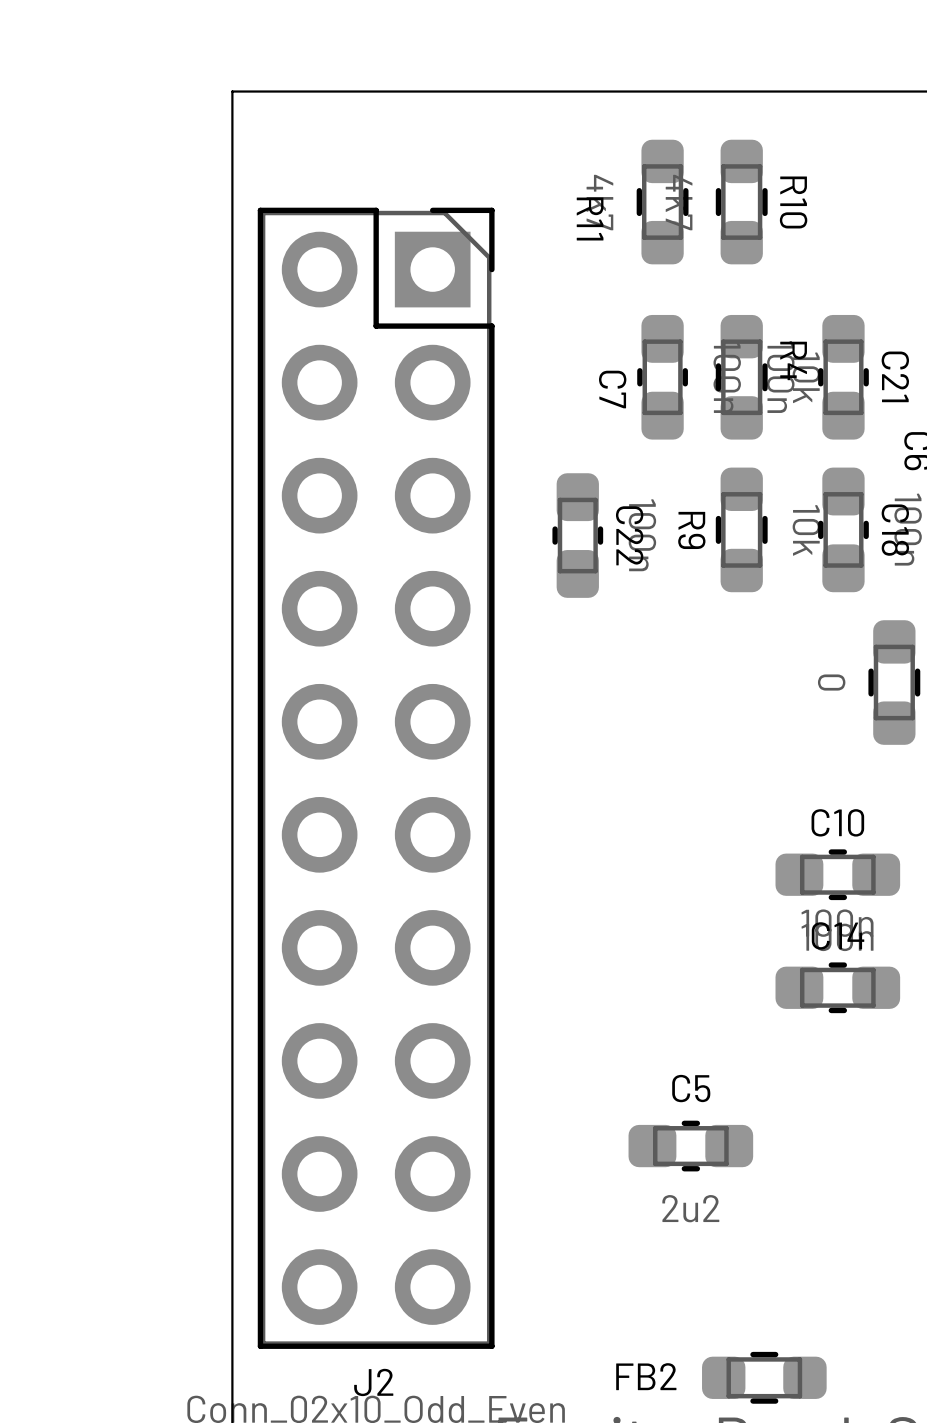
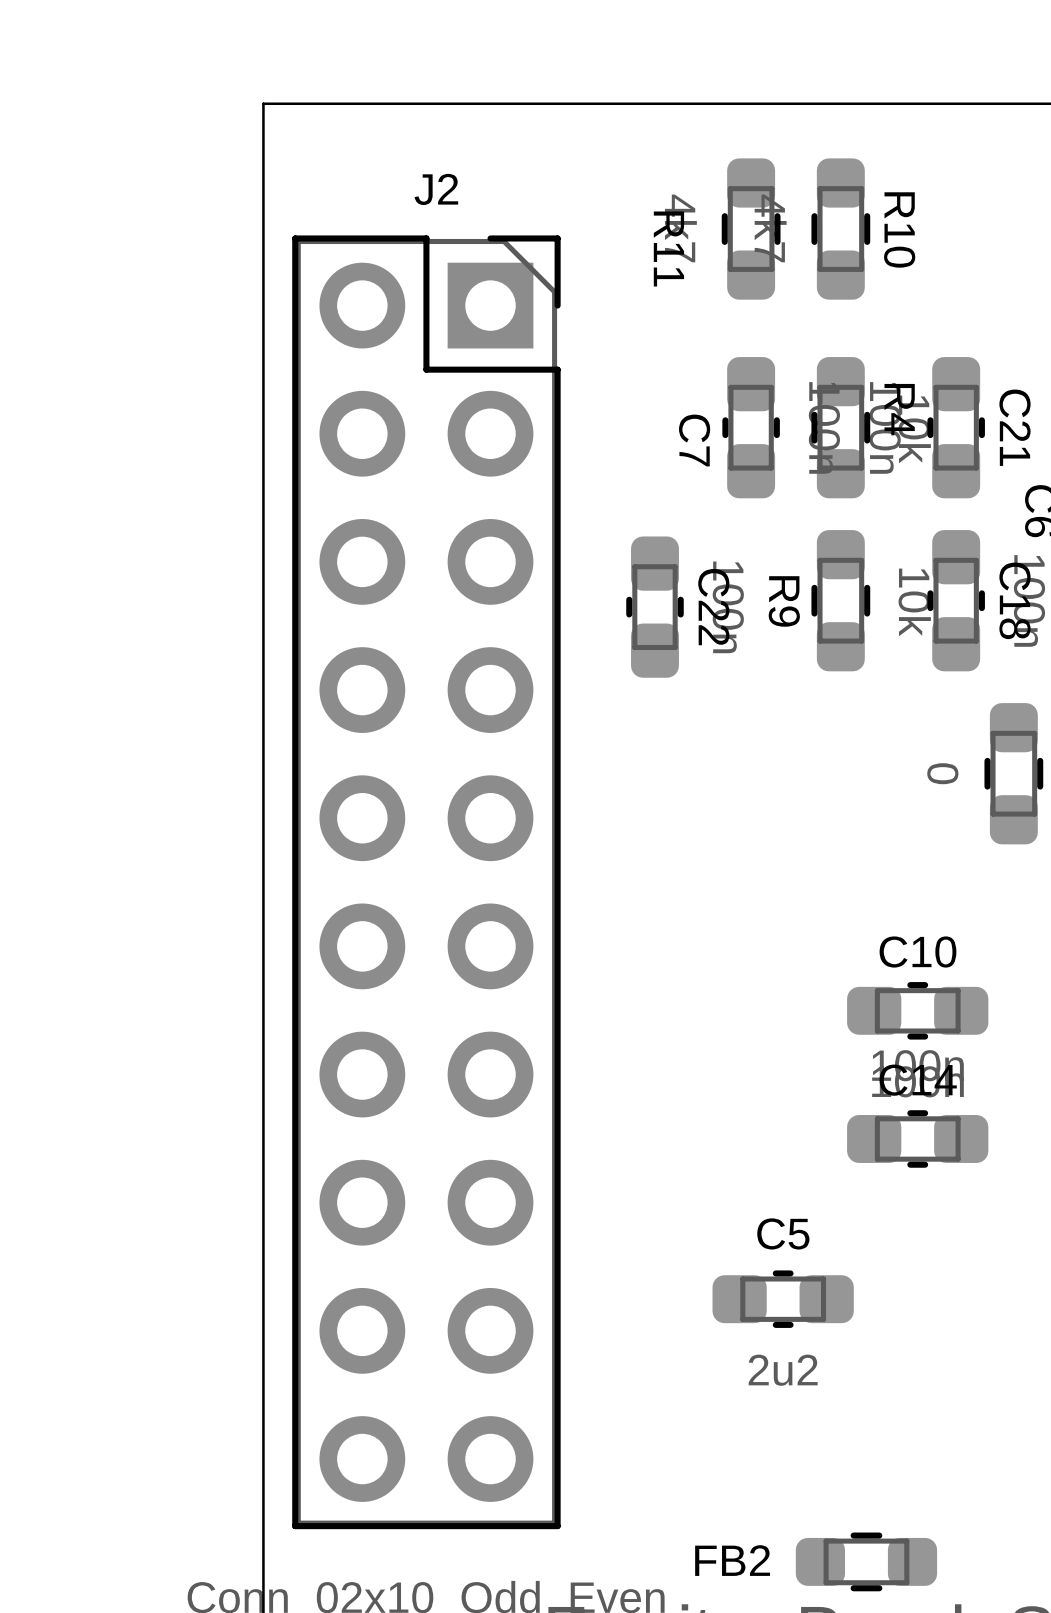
C10 position: (837, 874) -> (917, 1010)
C14 position: (837, 987) -> (917, 1138)
J2 name position: J2 (373, 1382) -> J2 (436, 189)

